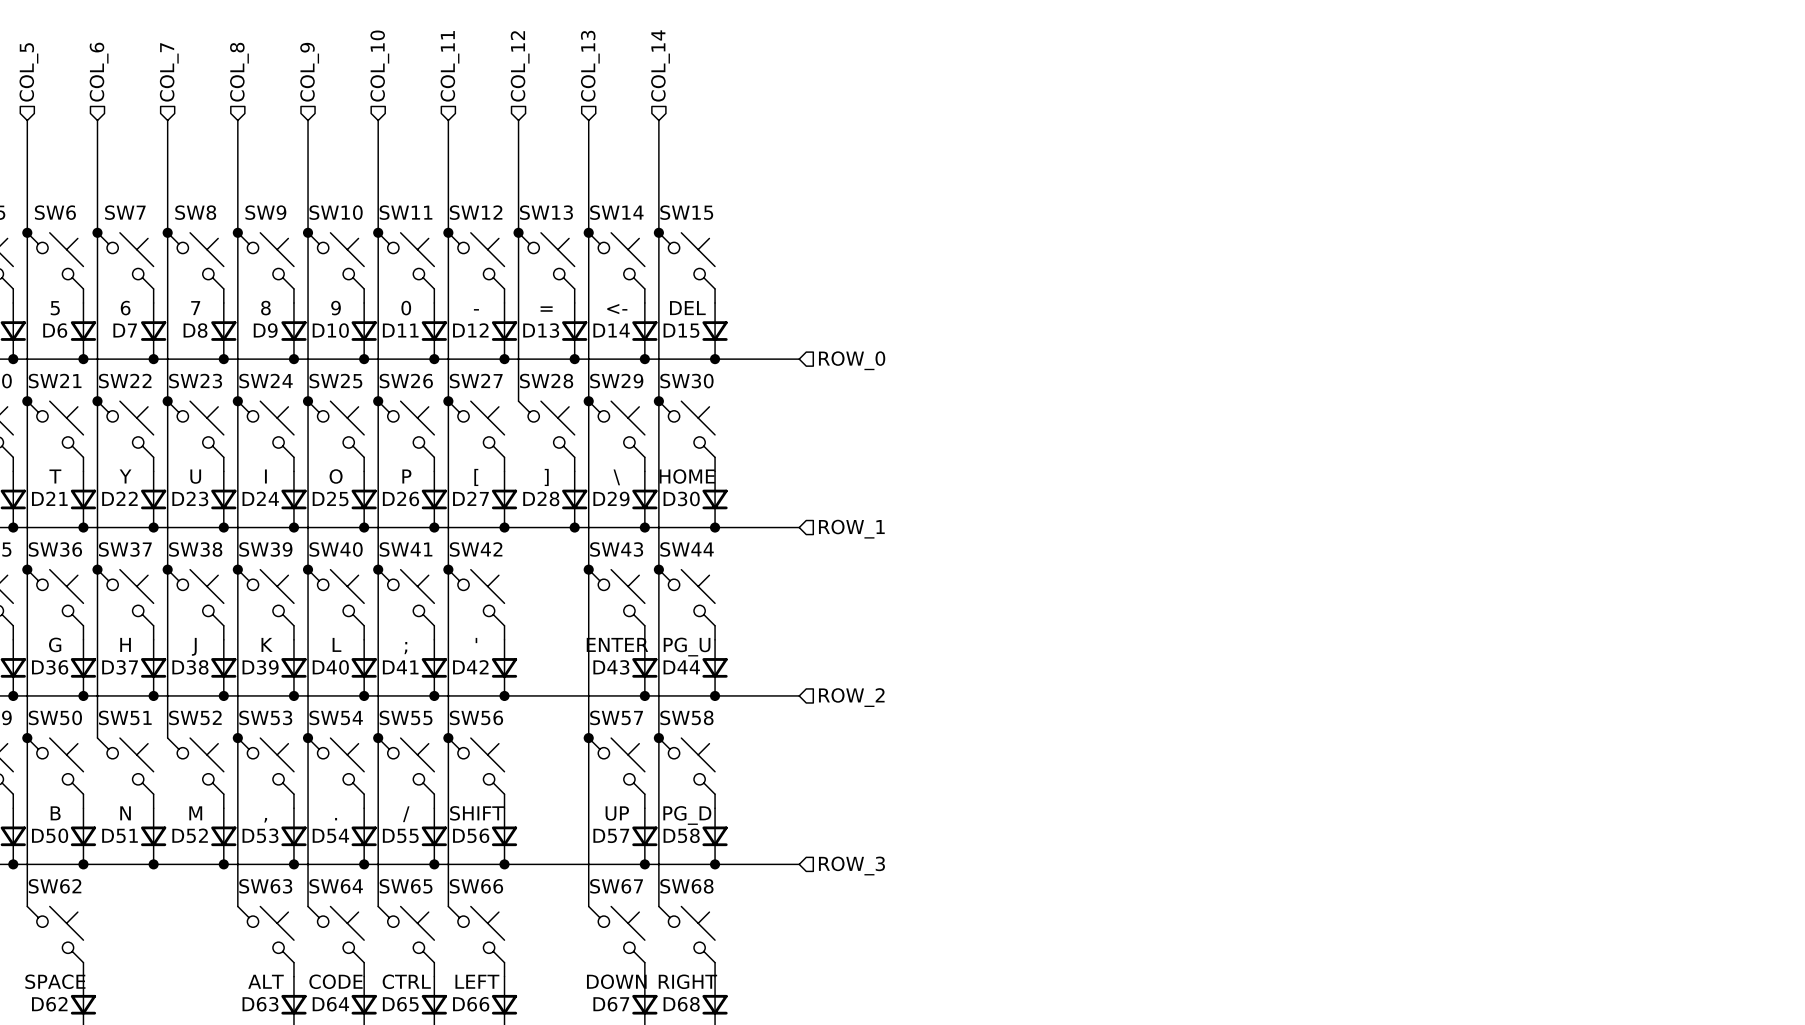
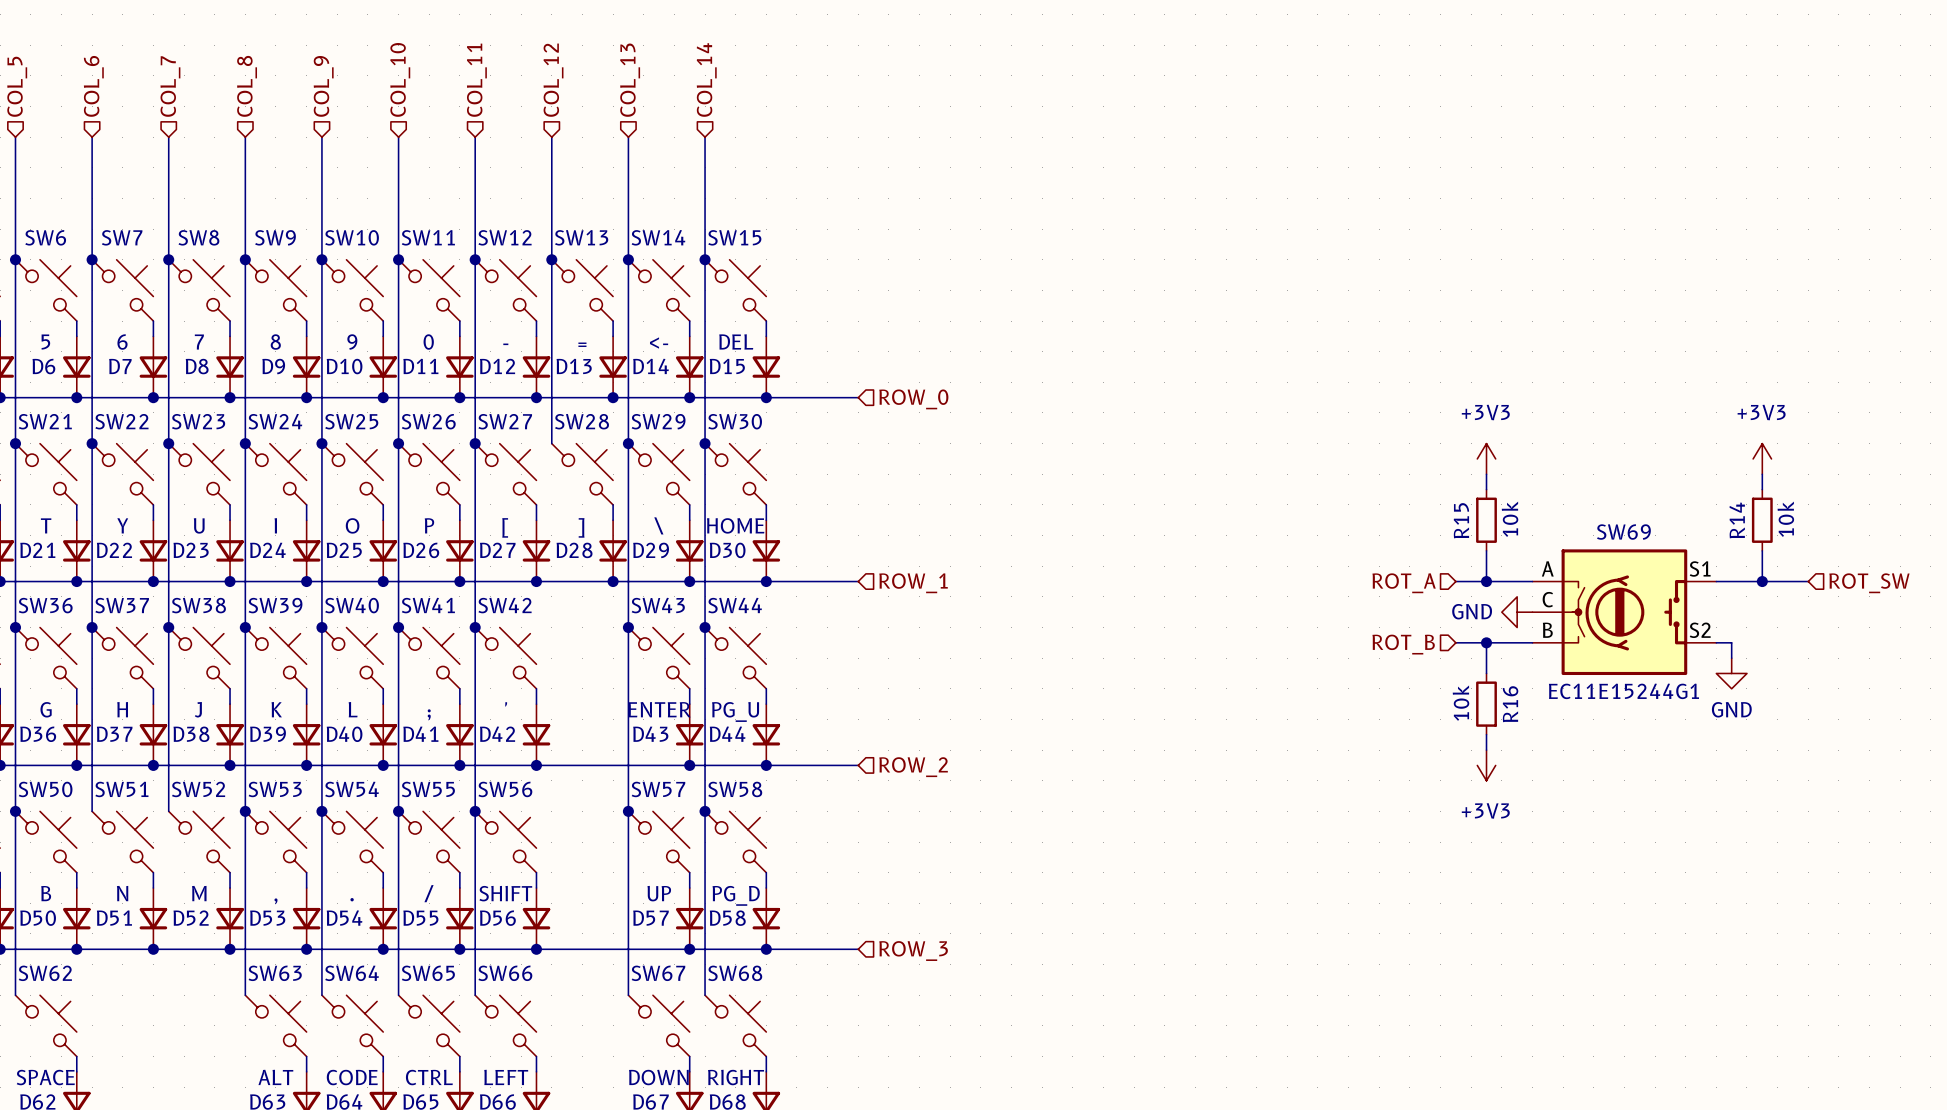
power symbol: none -> +3V3 (1486, 458)
power symbol: none -> +3V3 (1762, 458)
wire: none -> (1486, 474) (1486, 489)
wire: none -> (1762, 474) (1762, 489)
R15: none -> 10k (1486, 520)
R14: none -> 10k (1762, 520)
wire: none -> (1486, 550) (1486, 581)
wire: none -> (1762, 550) (1762, 581)
wire: none -> (1455, 581) (1532, 581)
junction: none -> (1486, 581)
wire: none -> (1716, 581) (1808, 581)
junction: none -> (1762, 581)
hierarchical label: none -> ROT_A (1404, 583)
hierarchical label: none -> ROT_SW (1869, 583)
power symbol: none -> GND (1517, 612)
SW69: none -> EC11E15244G1 (1624, 612)
wire: none -> (1455, 642) (1532, 642)
wire: none -> (1486, 642) (1486, 673)
junction: none -> (1486, 642)
wire: none -> (1716, 642) (1731, 642) (1731, 658)
hierarchical label: none -> ROT_B (1403, 644)
power symbol: none -> GND (1731, 673)
R16: none -> 10k (1486, 704)
wire: none -> (1486, 734) (1486, 750)
power symbol: none -> +3V3 (1486, 765)

